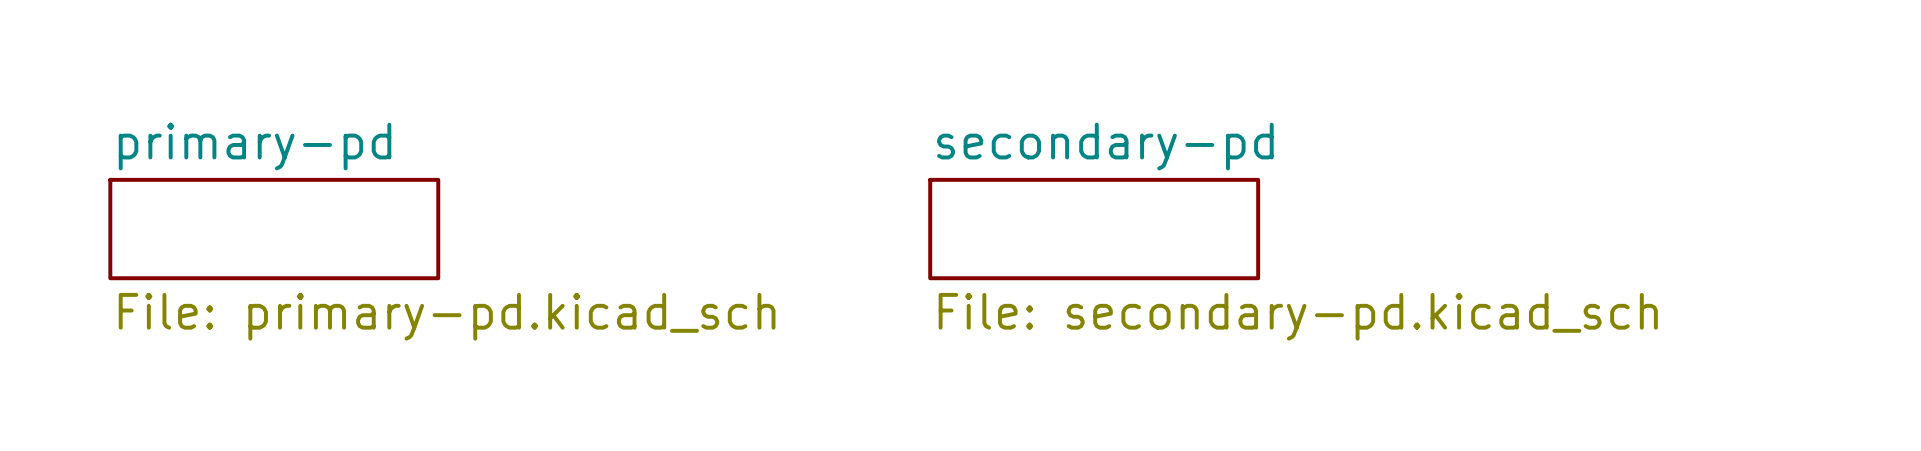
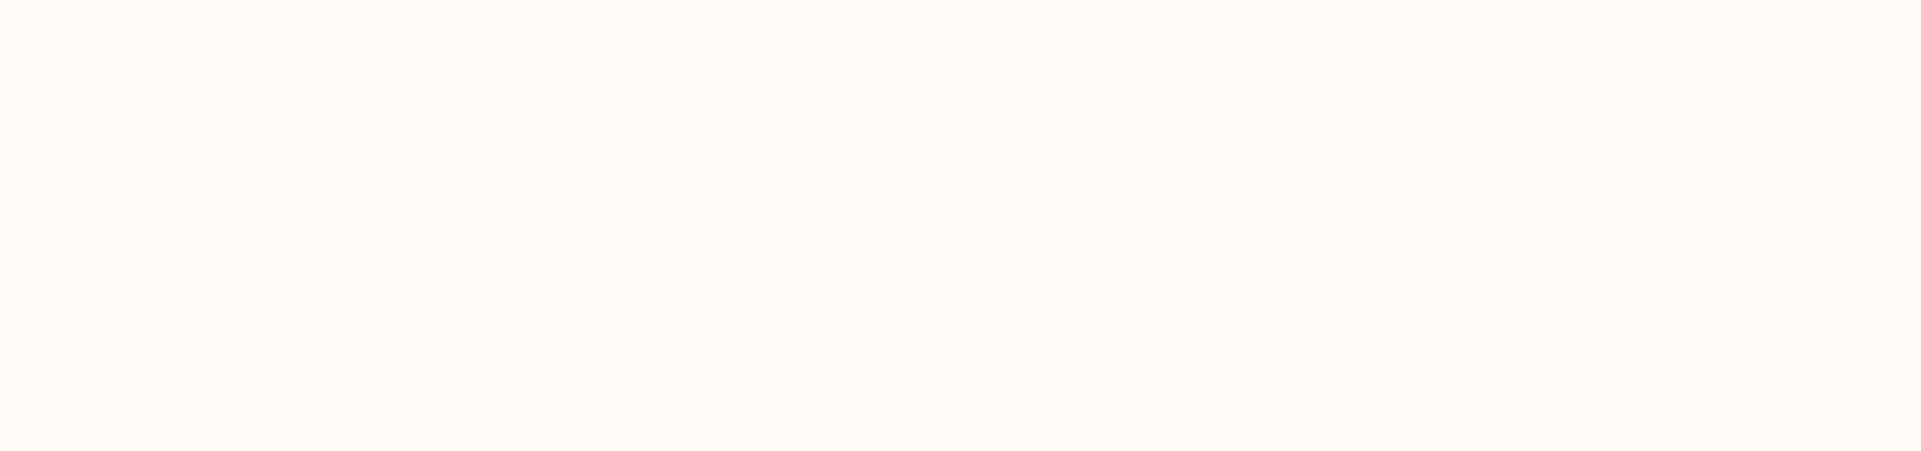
sheet primary-pd: File: primary-pd.kicad_sch (274, 229) -> none
sheet secondary-pd: File: secondary-pd.kicad_sch (1094, 229) -> none

